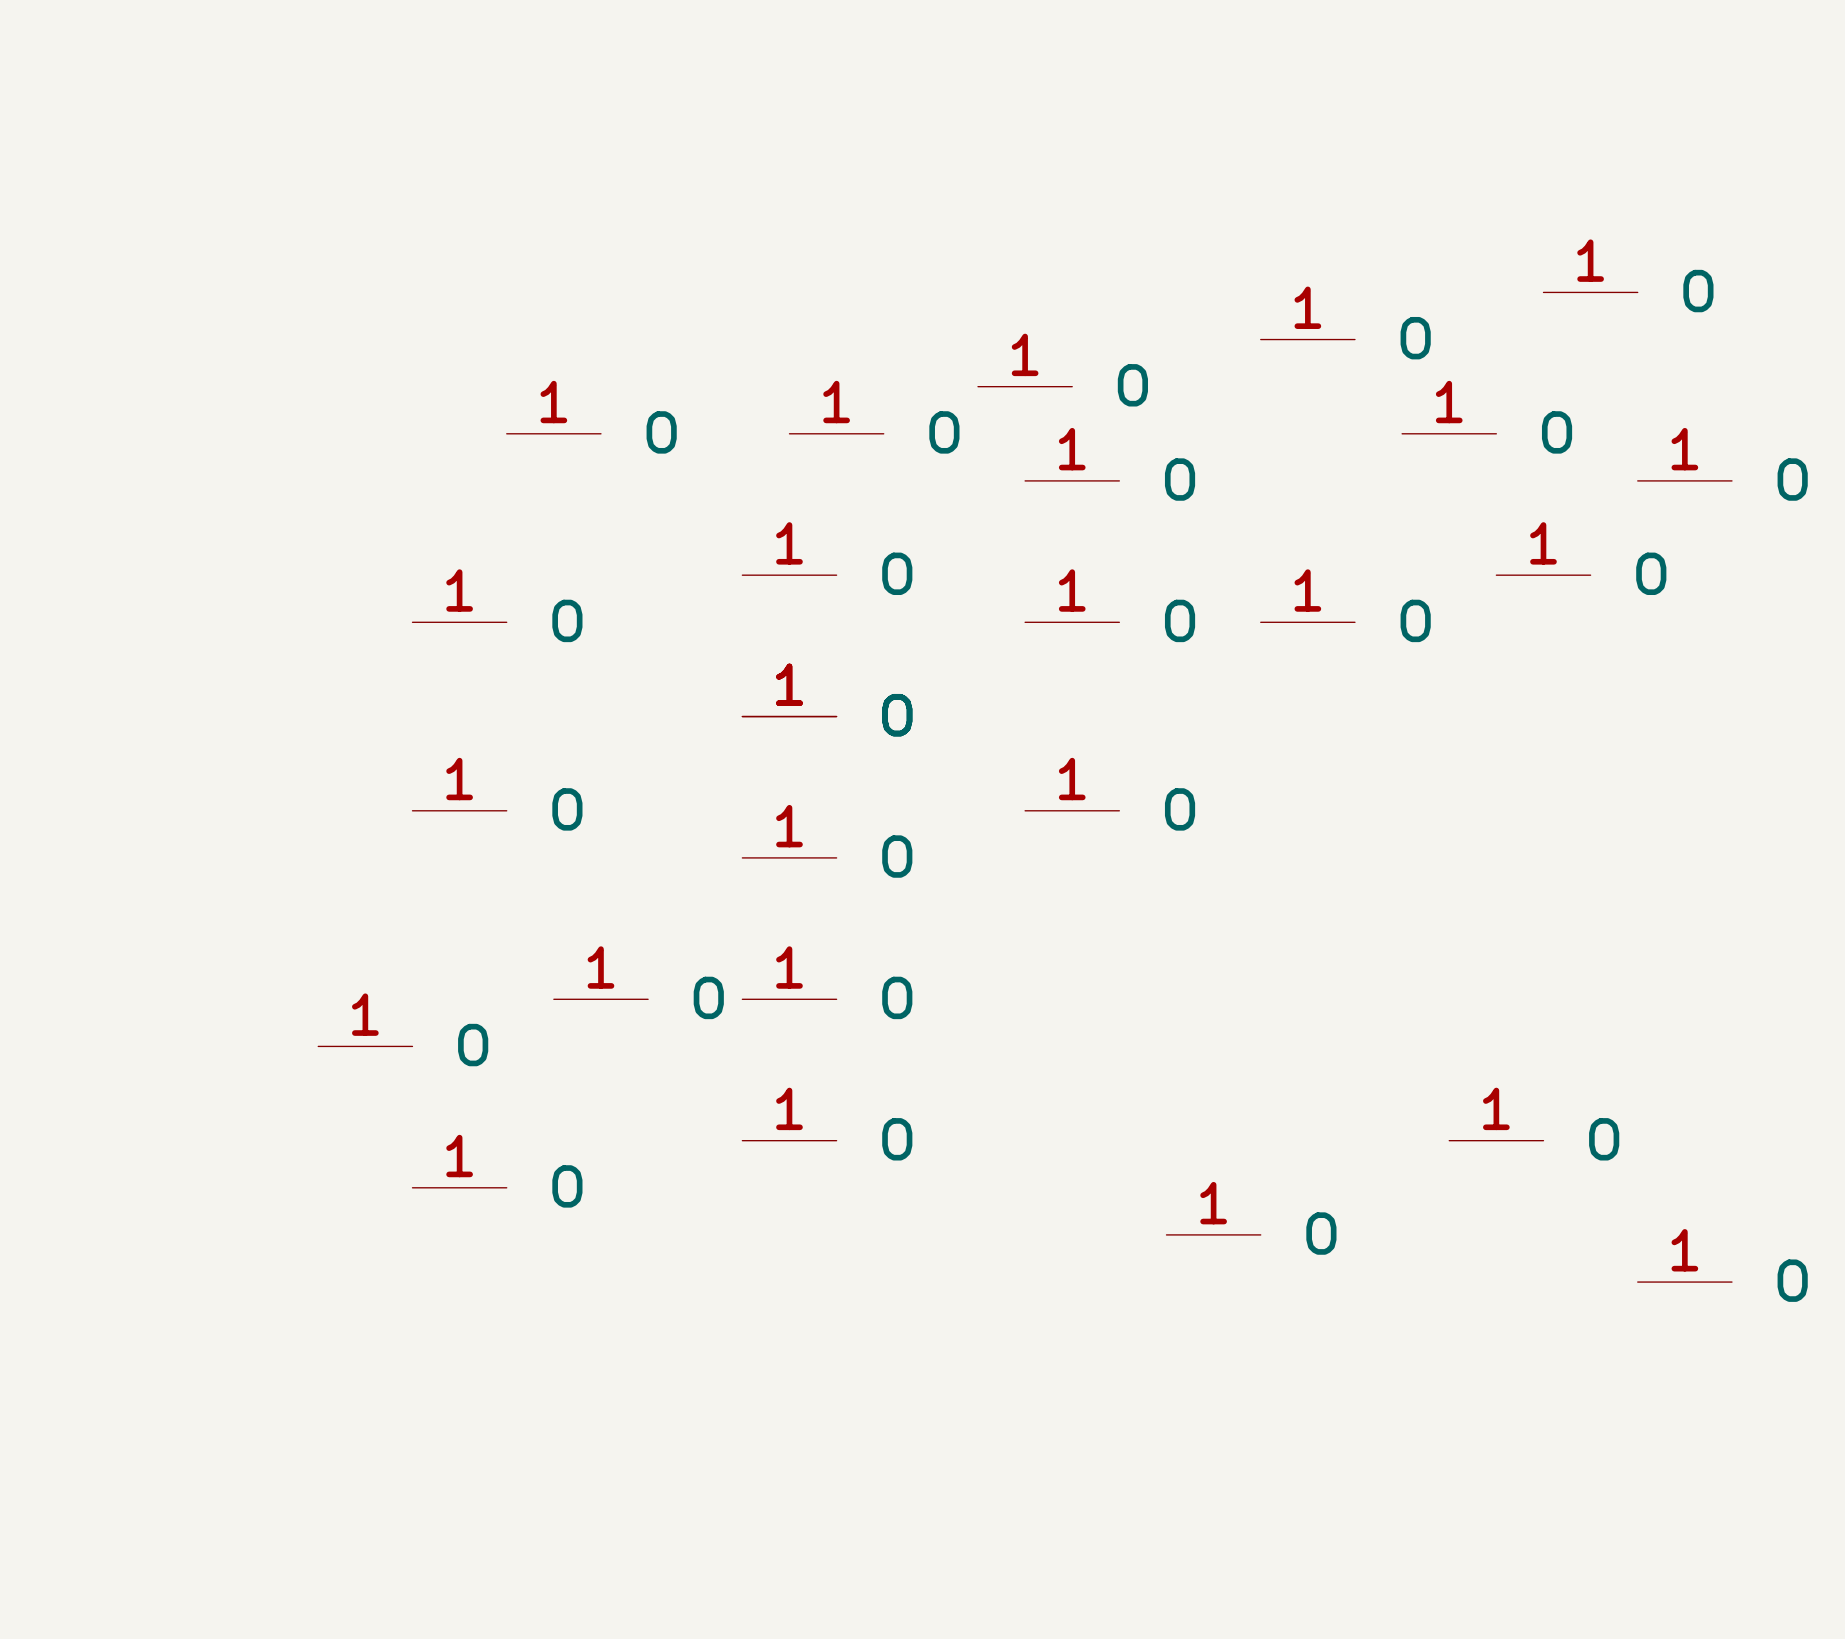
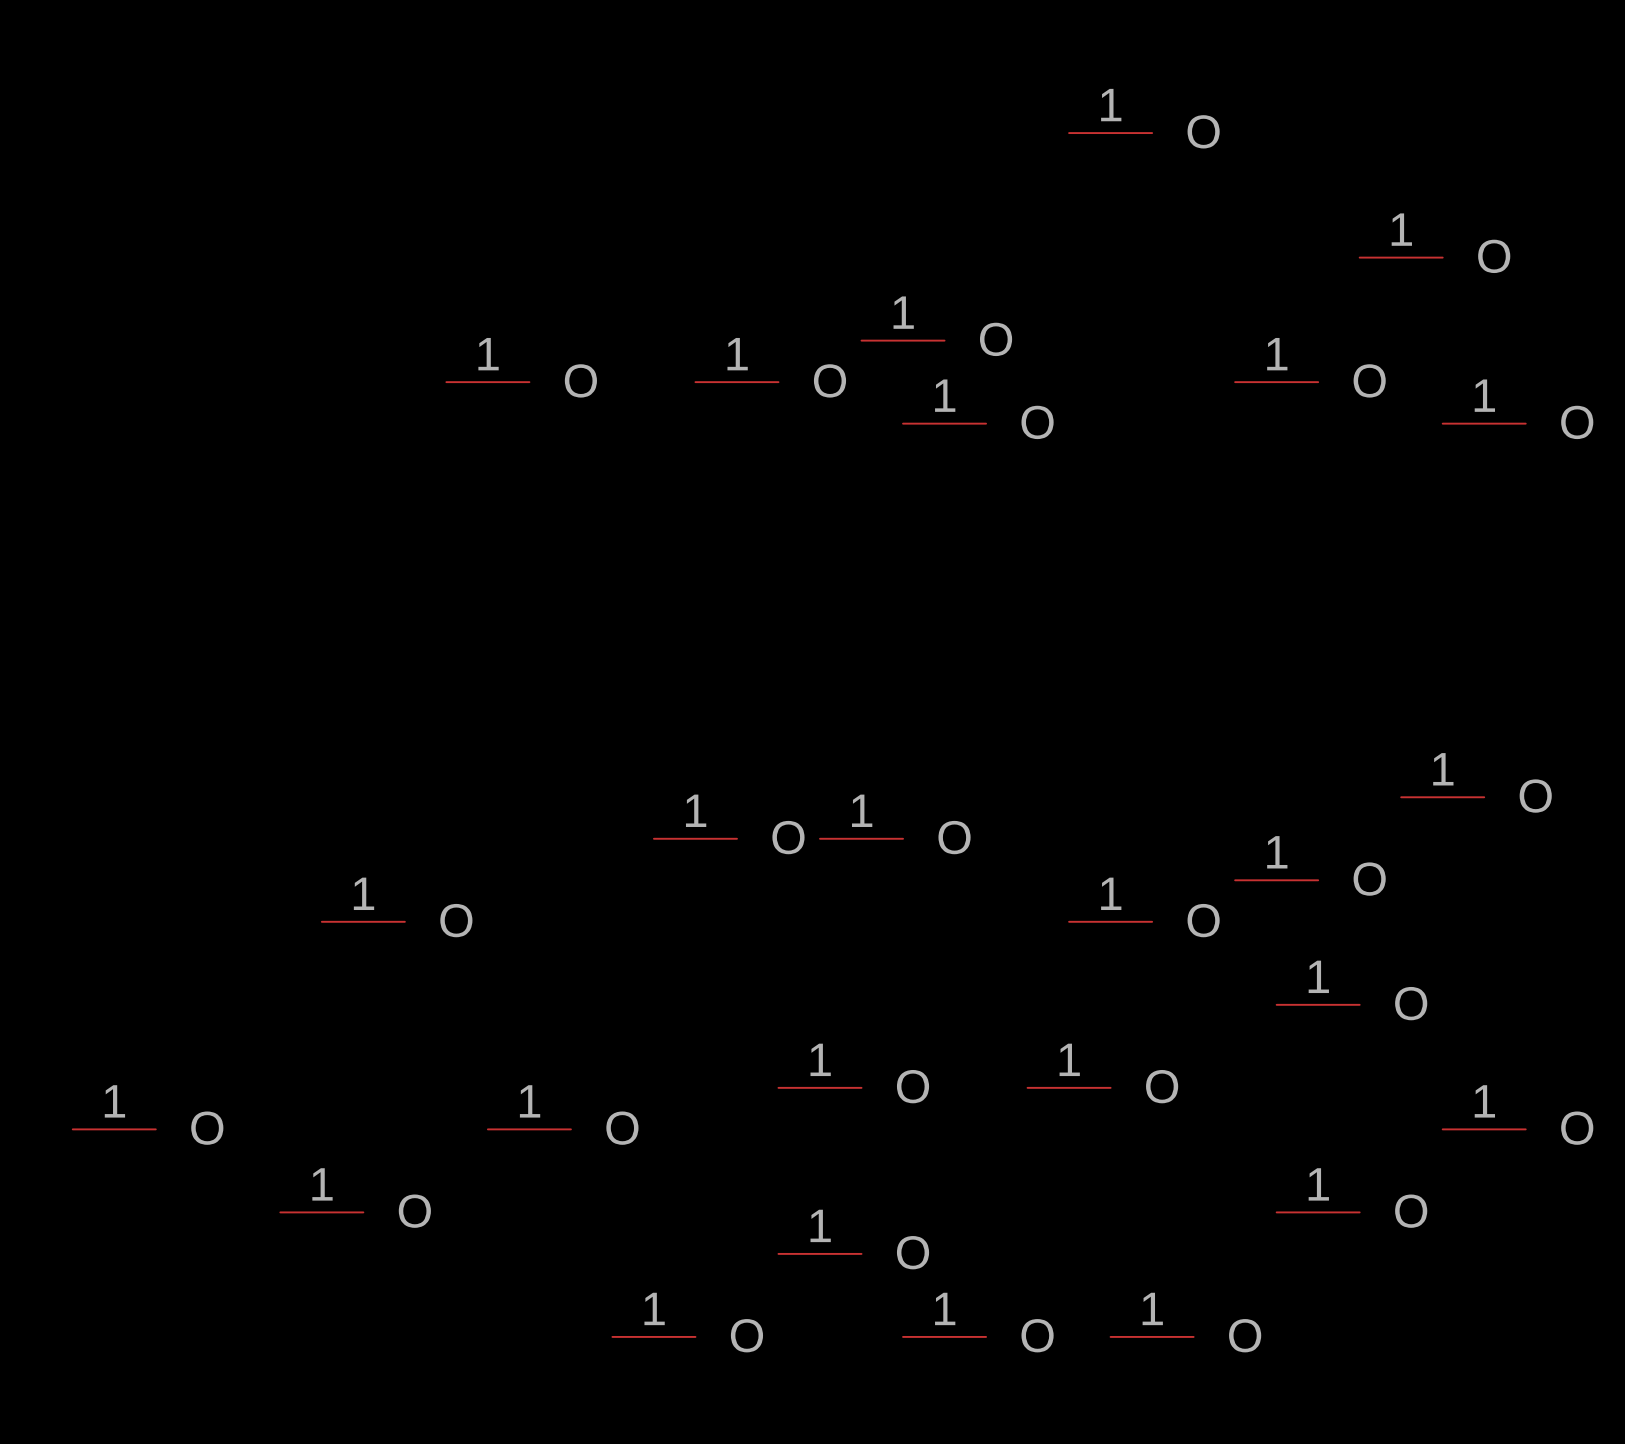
part position: (1307, 339) -> (1110, 133)
part: (789, 575) -> none
part: (1543, 575) -> none
part: (459, 622) -> none
part: (1072, 622) -> none
part: (1307, 622) -> none
part: (789, 716) -> none
part: (459, 810) -> none
part: (1072, 810) -> none
part: (789, 857) -> none
part: none -> (1442, 797)
part: none -> (695, 838)
part: none -> (861, 838)
part: (600, 999) -> none
part: (789, 999) -> none
part: none -> (1276, 880)
part position: (365, 1046) -> (363, 921)
part: none -> (1110, 921)
part: (789, 1140) -> none
part: (459, 1187) -> none
part: none -> (820, 1087)
part: none -> (114, 1129)
part: none -> (529, 1129)
part: none -> (321, 1212)
part: none -> (1318, 1212)
part: none -> (820, 1253)
part: none -> (653, 1336)
part: none -> (944, 1336)
part: none -> (1152, 1336)

